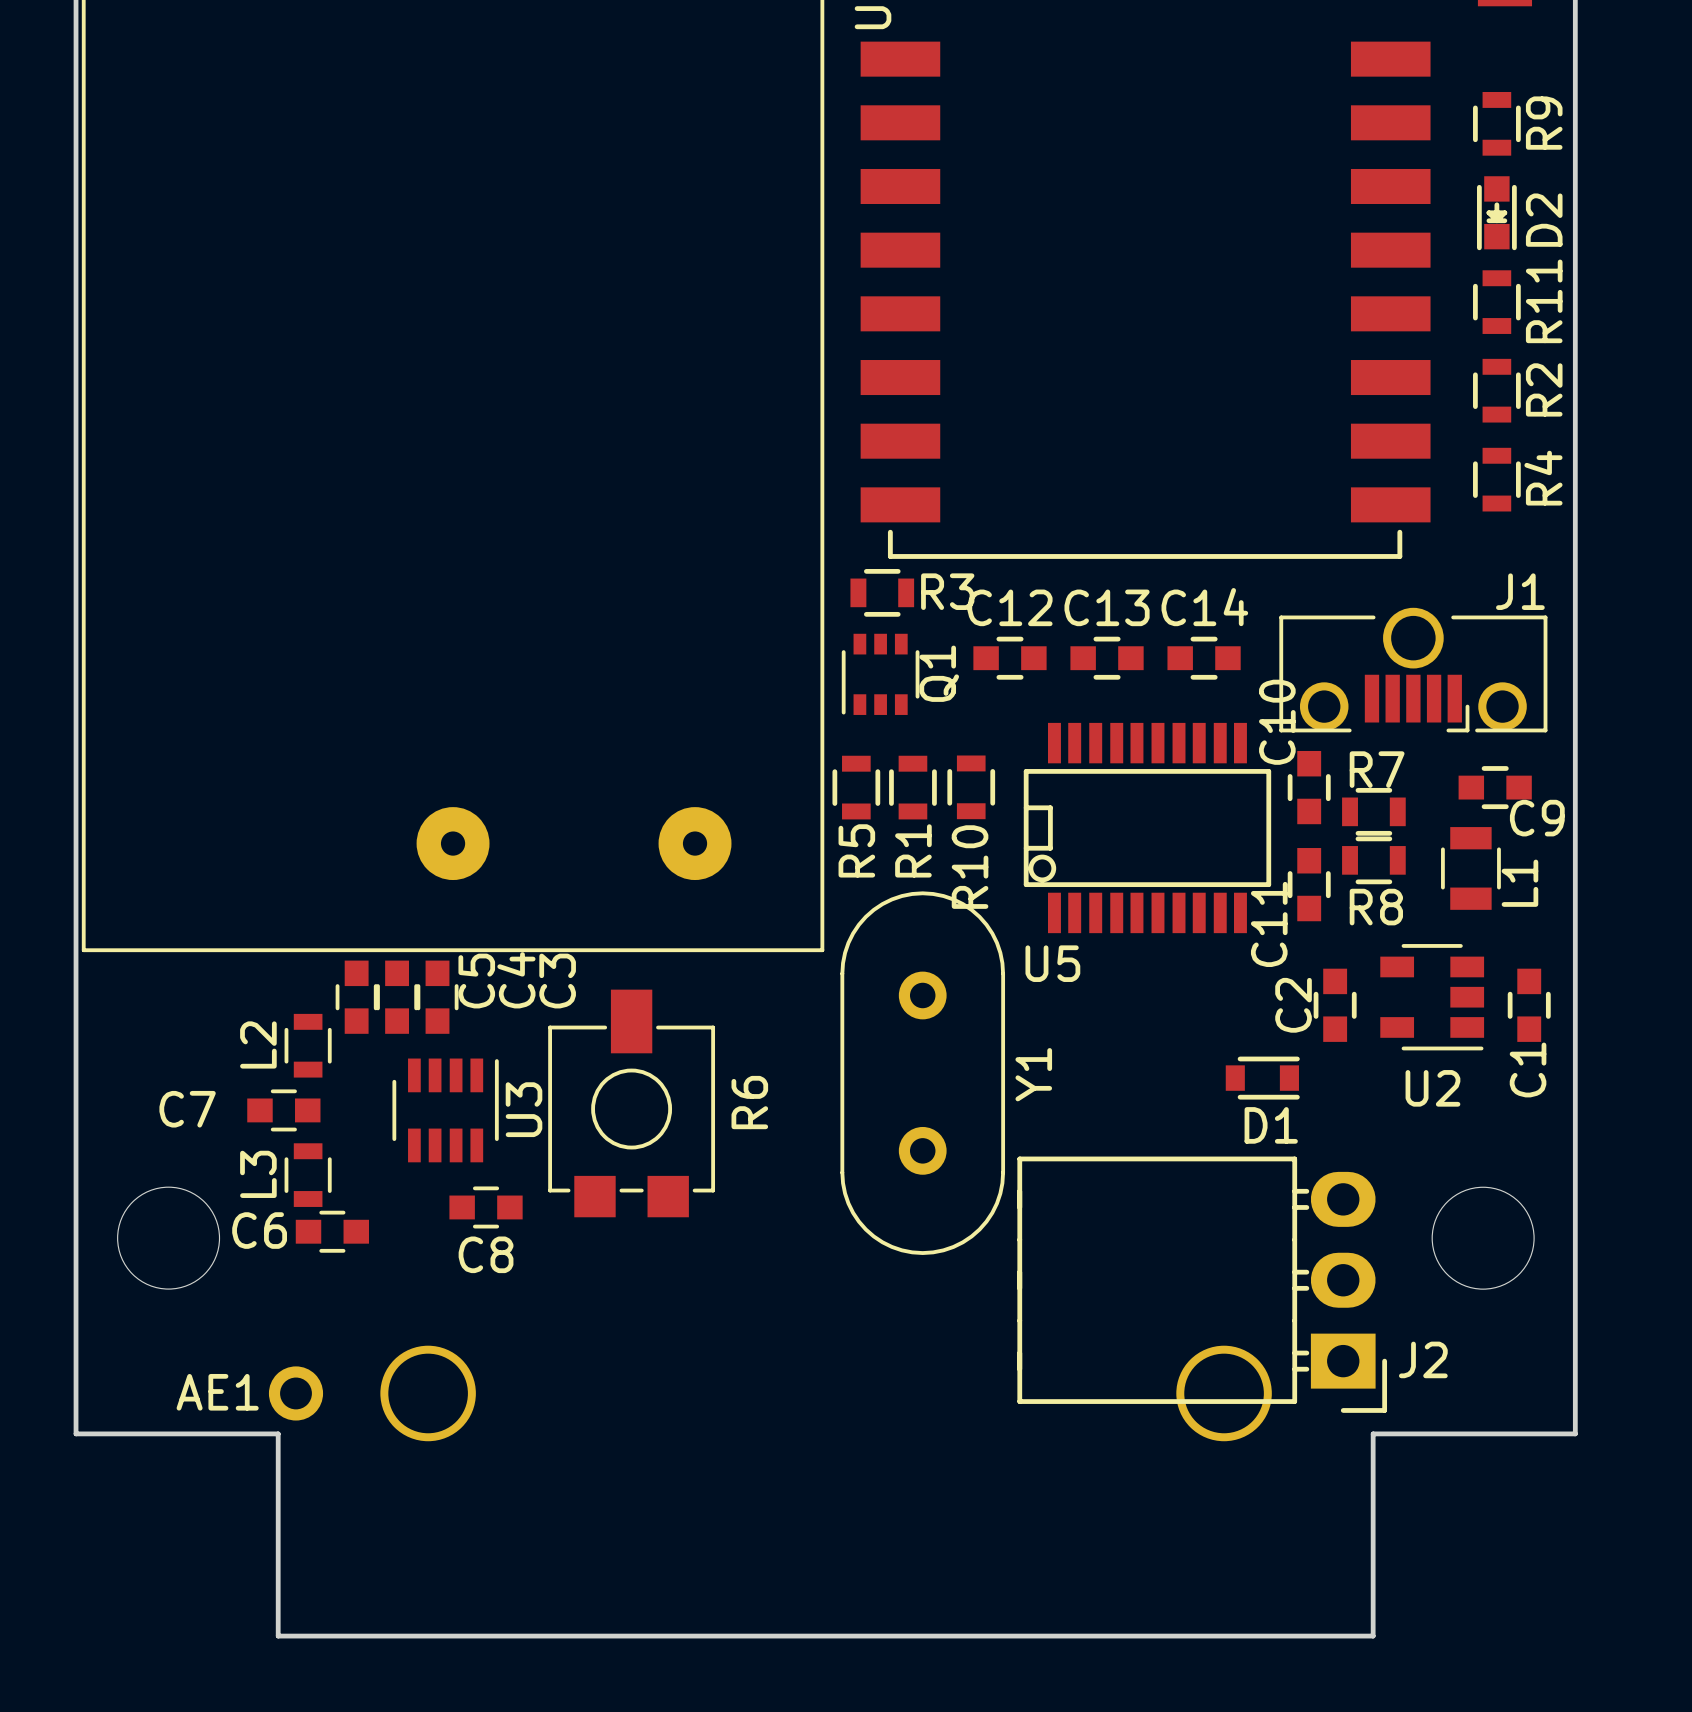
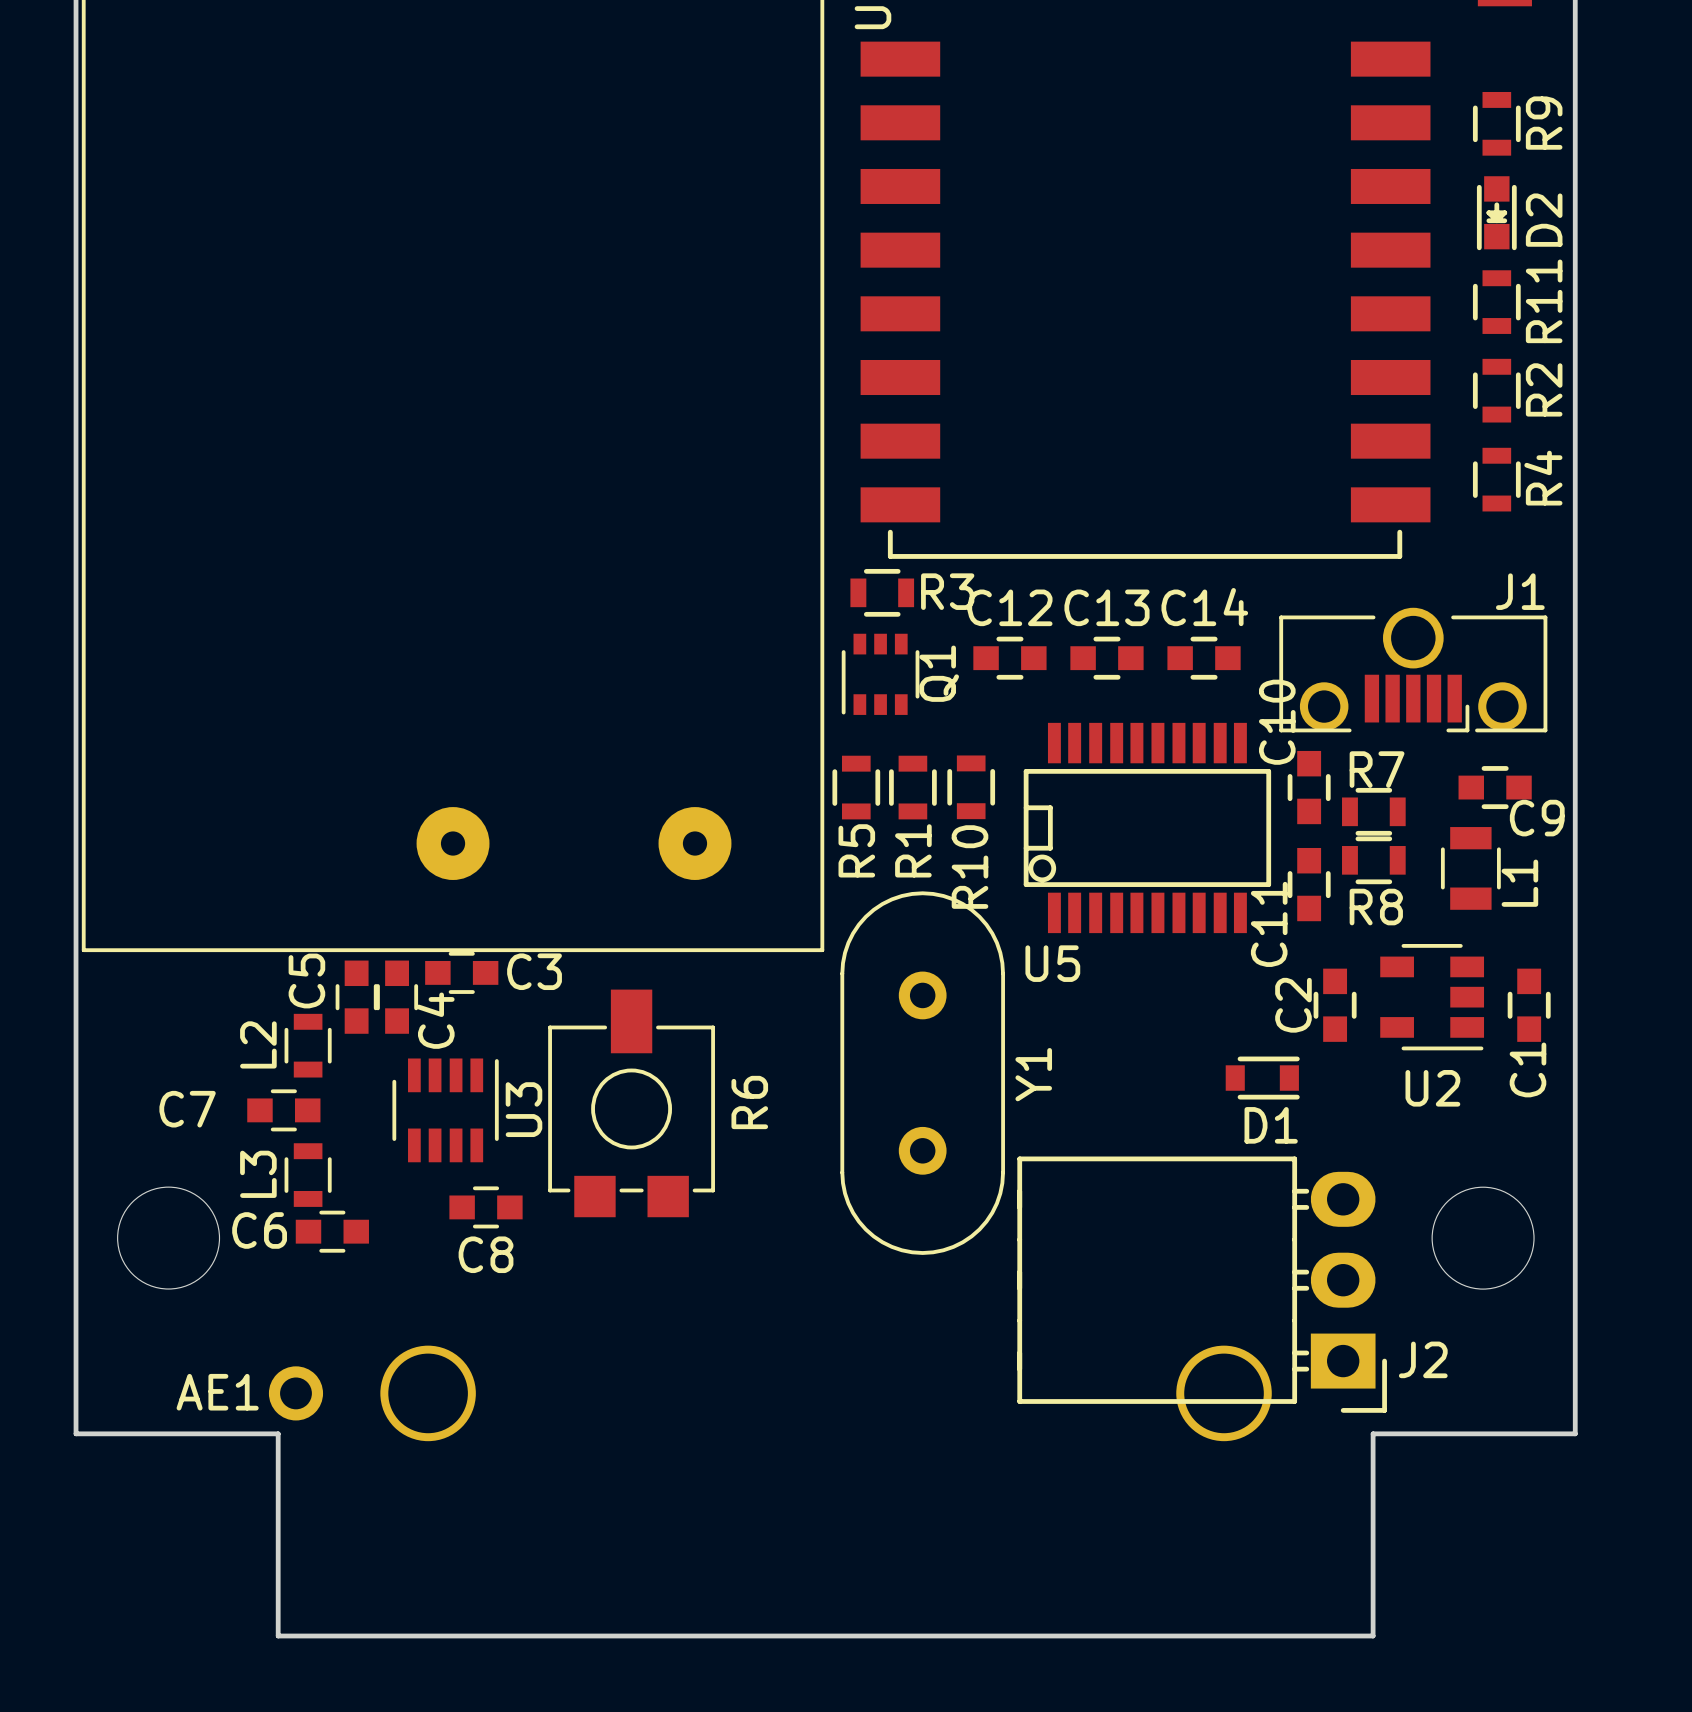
C4 name position: C4 (516, 980) -> C4 (435, 1020)
C5 name position: C5 (476, 981) -> C5 (306, 980)
C3 rotation: 0° (437, 997) -> 90° clockwise (461, 972)

